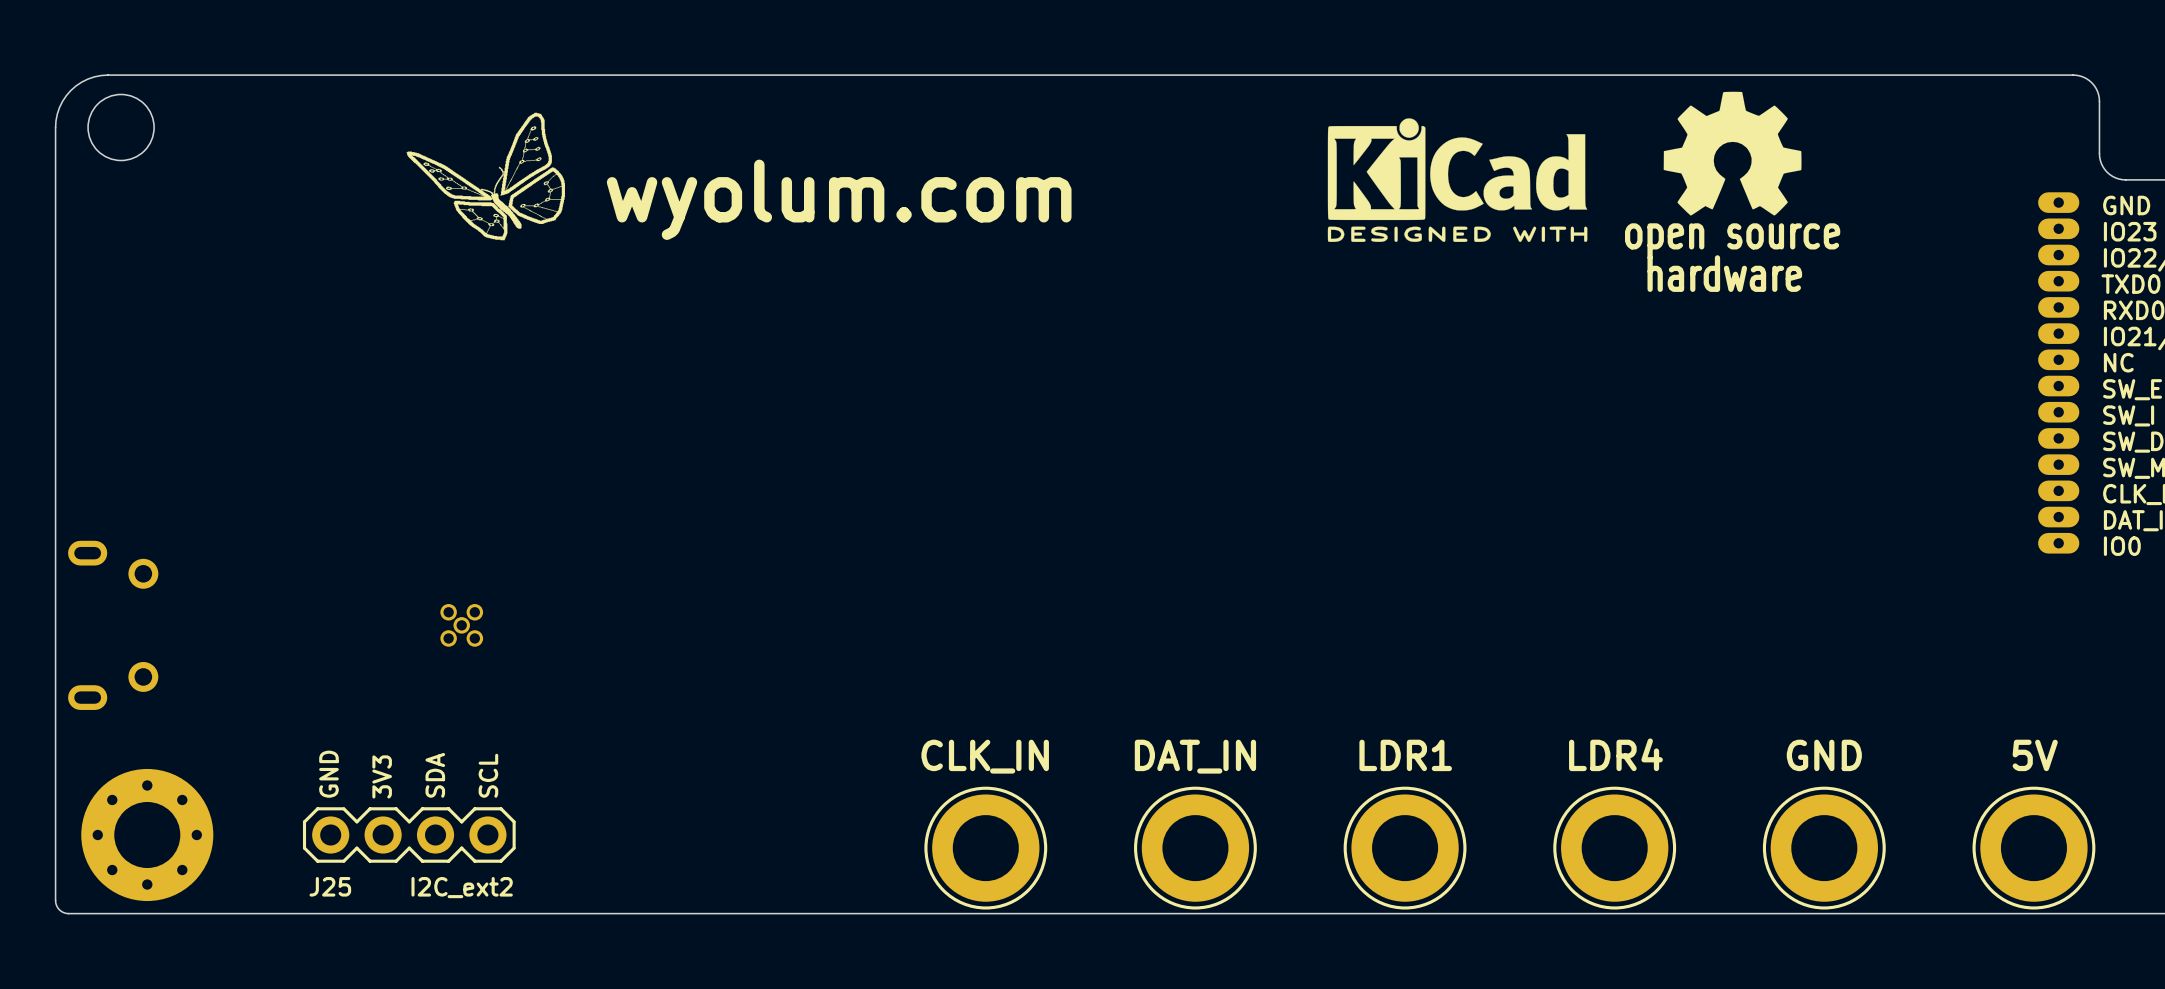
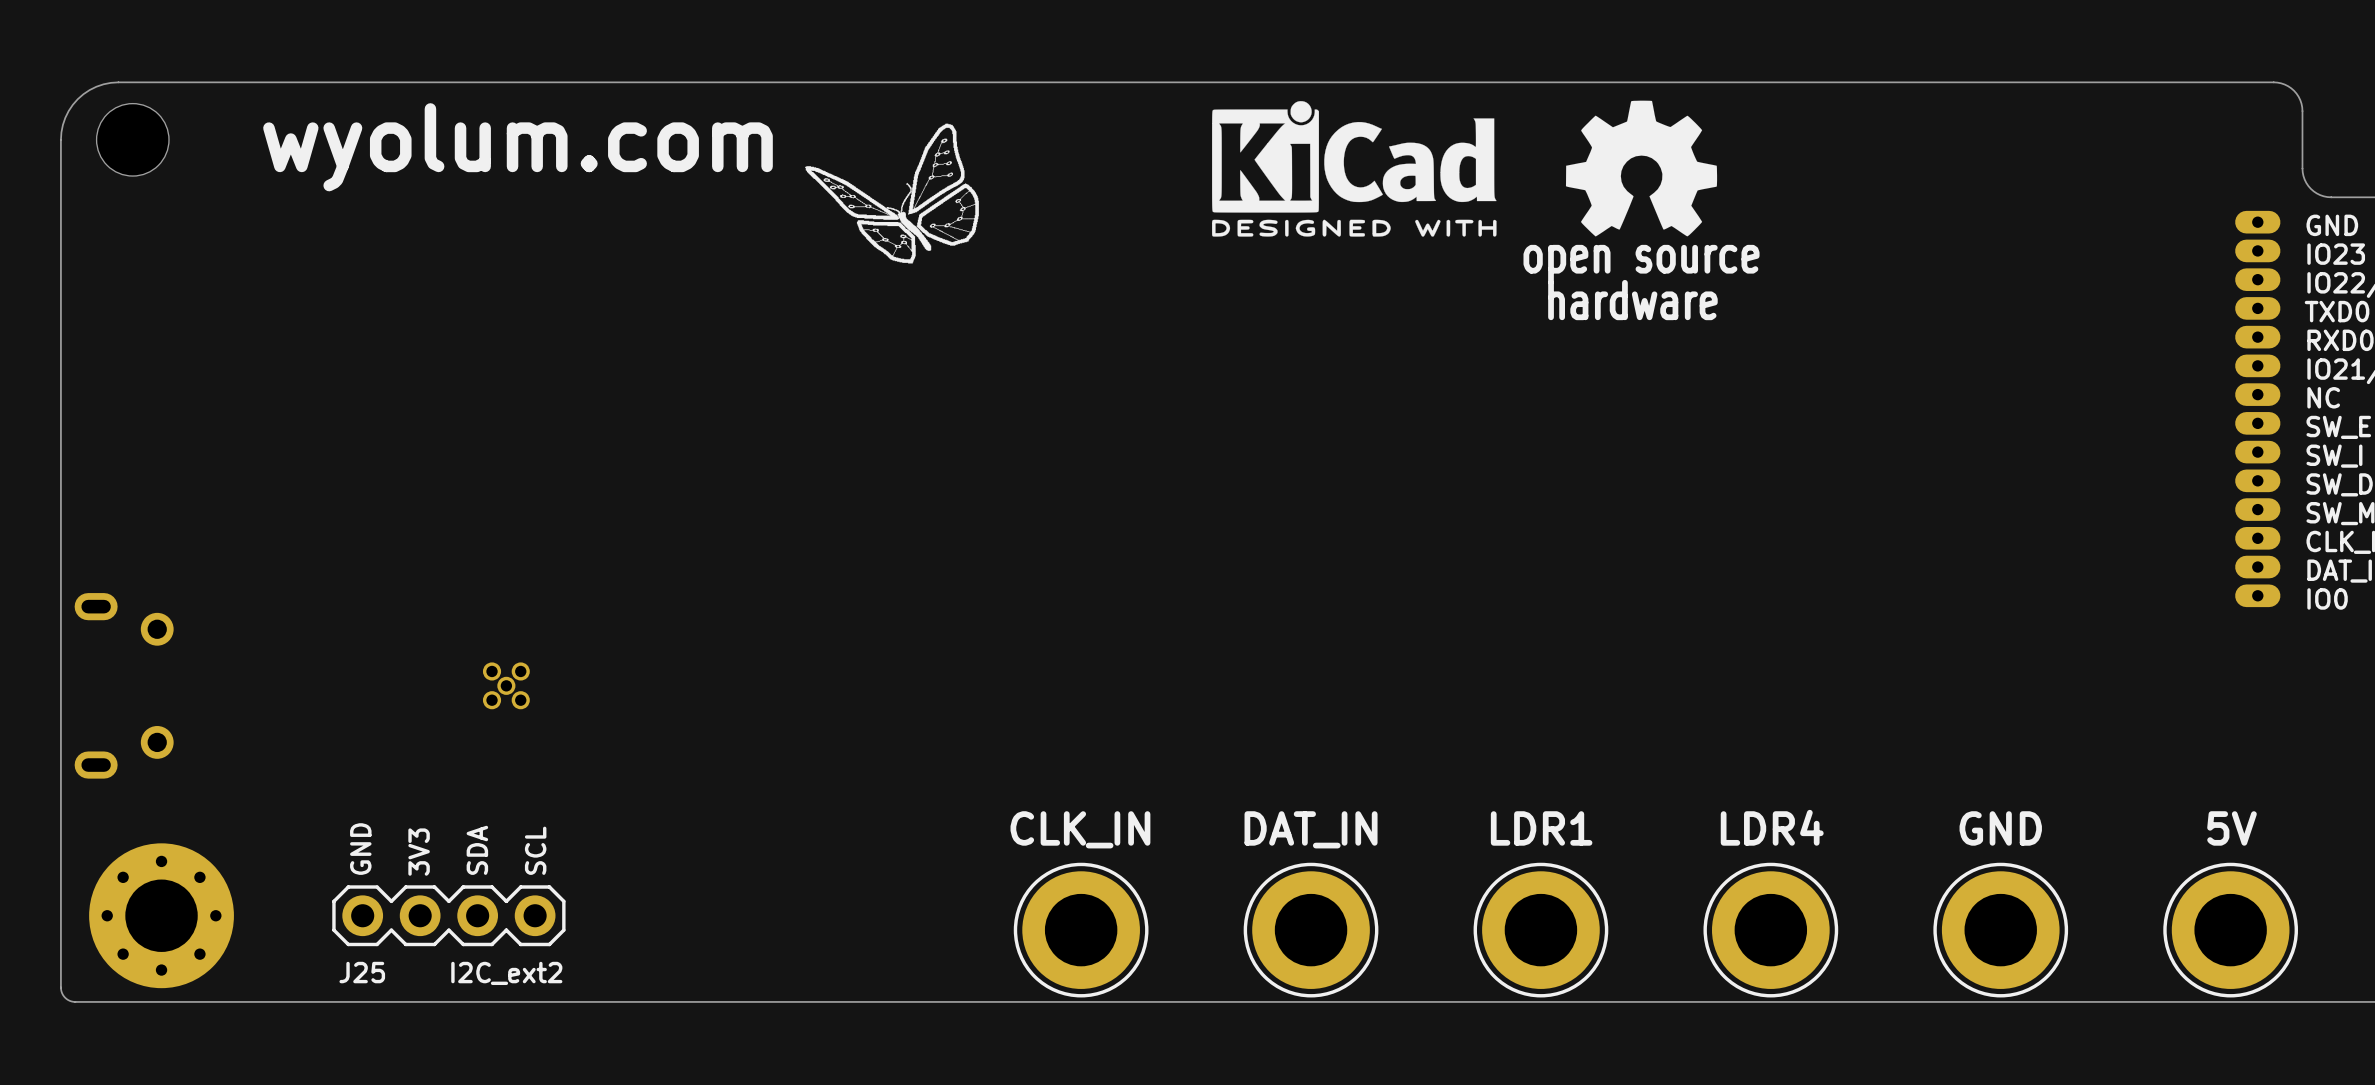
drawing position: (1732, 153) -> (1641, 168)
drawing position: (485, 176) -> (892, 193)
drawing position: (1457, 180) -> (1354, 168)
text position: wyolum.com (839, 199) -> wyolum.com (518, 147)
text position: open source (1732, 241) -> open source (1641, 264)
text position: hardware (1724, 273) -> hardware (1632, 300)

